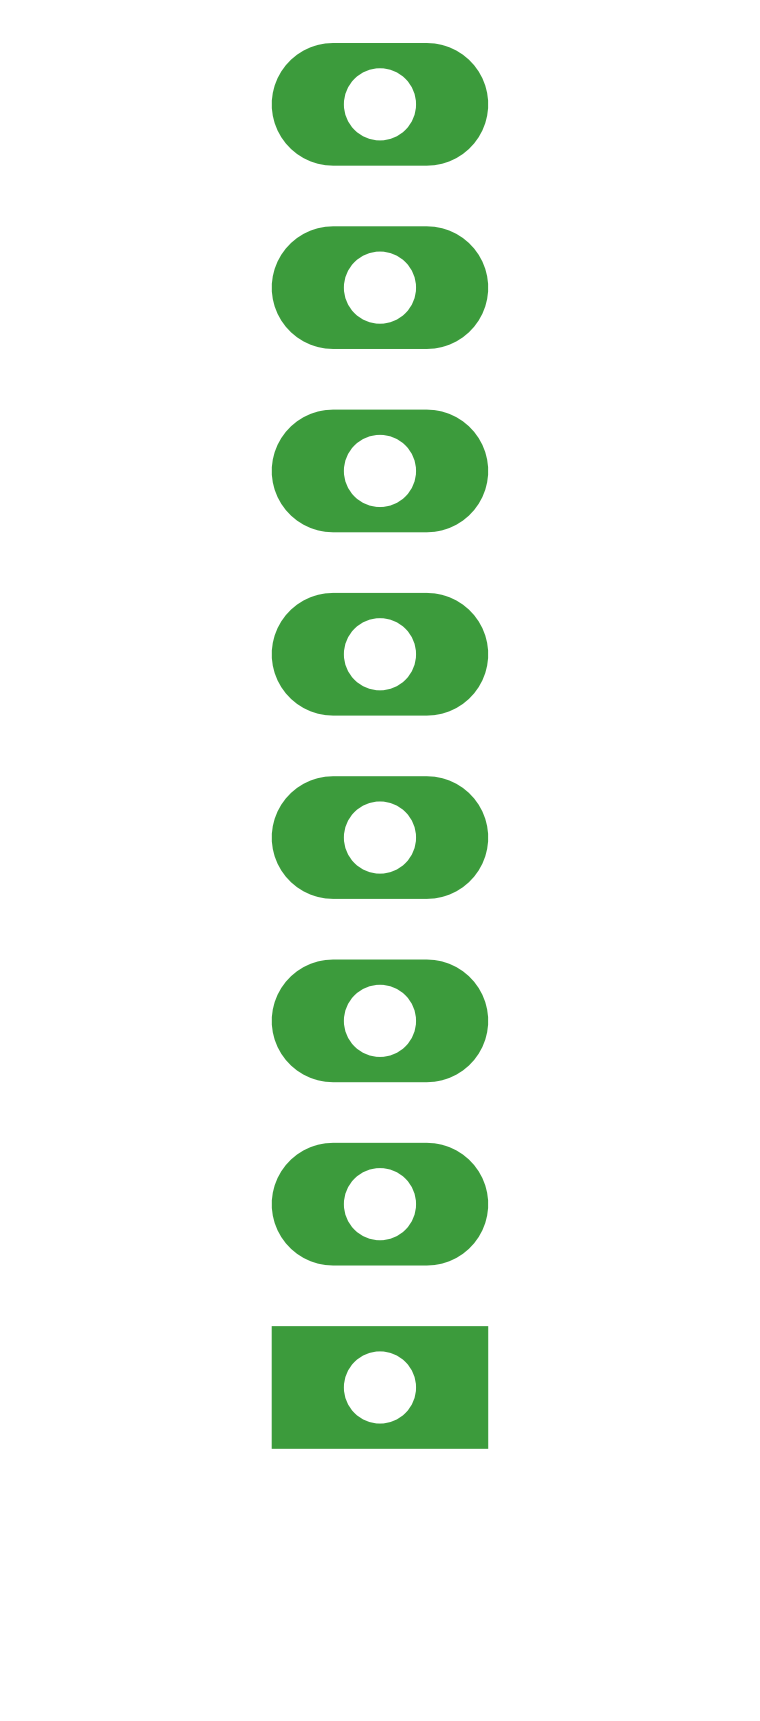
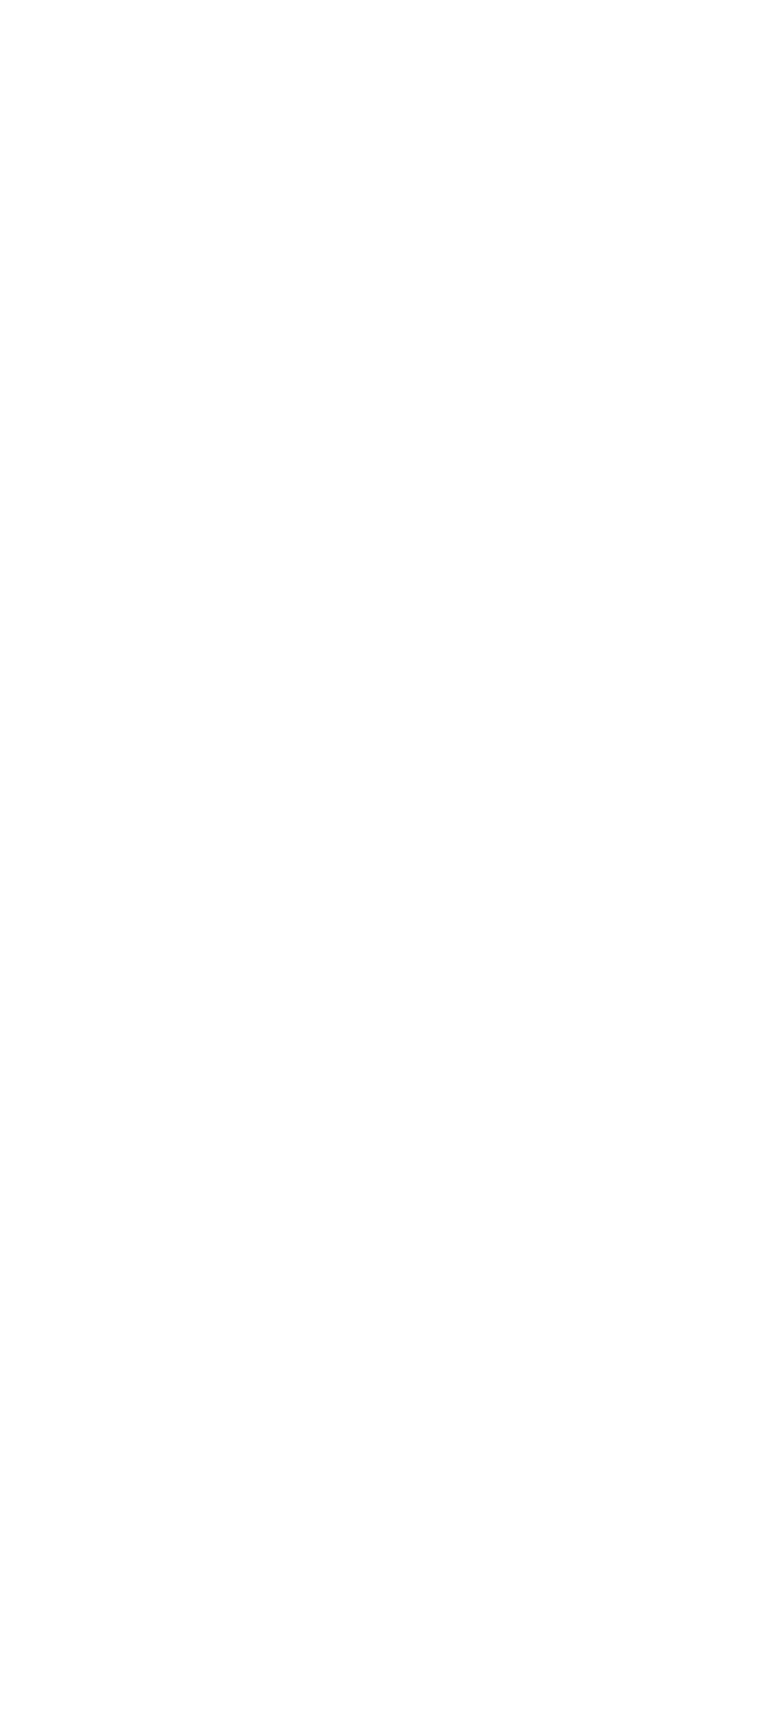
part: (379, 745) -> none

